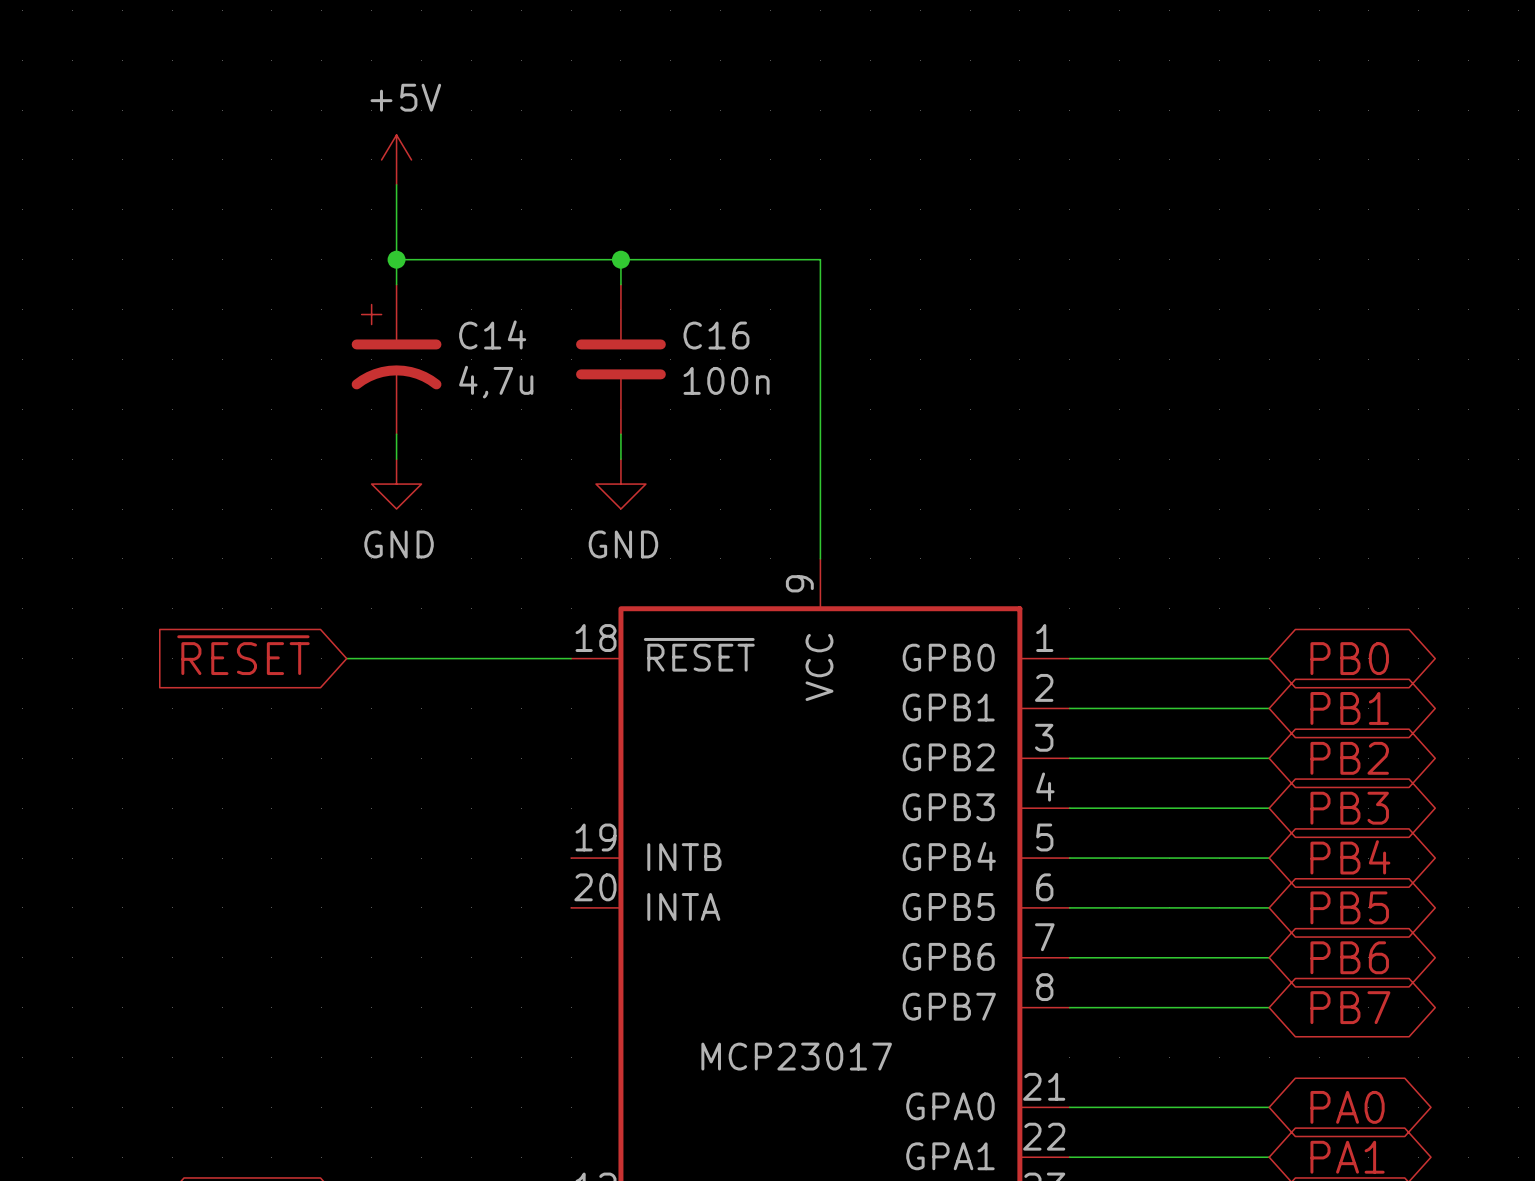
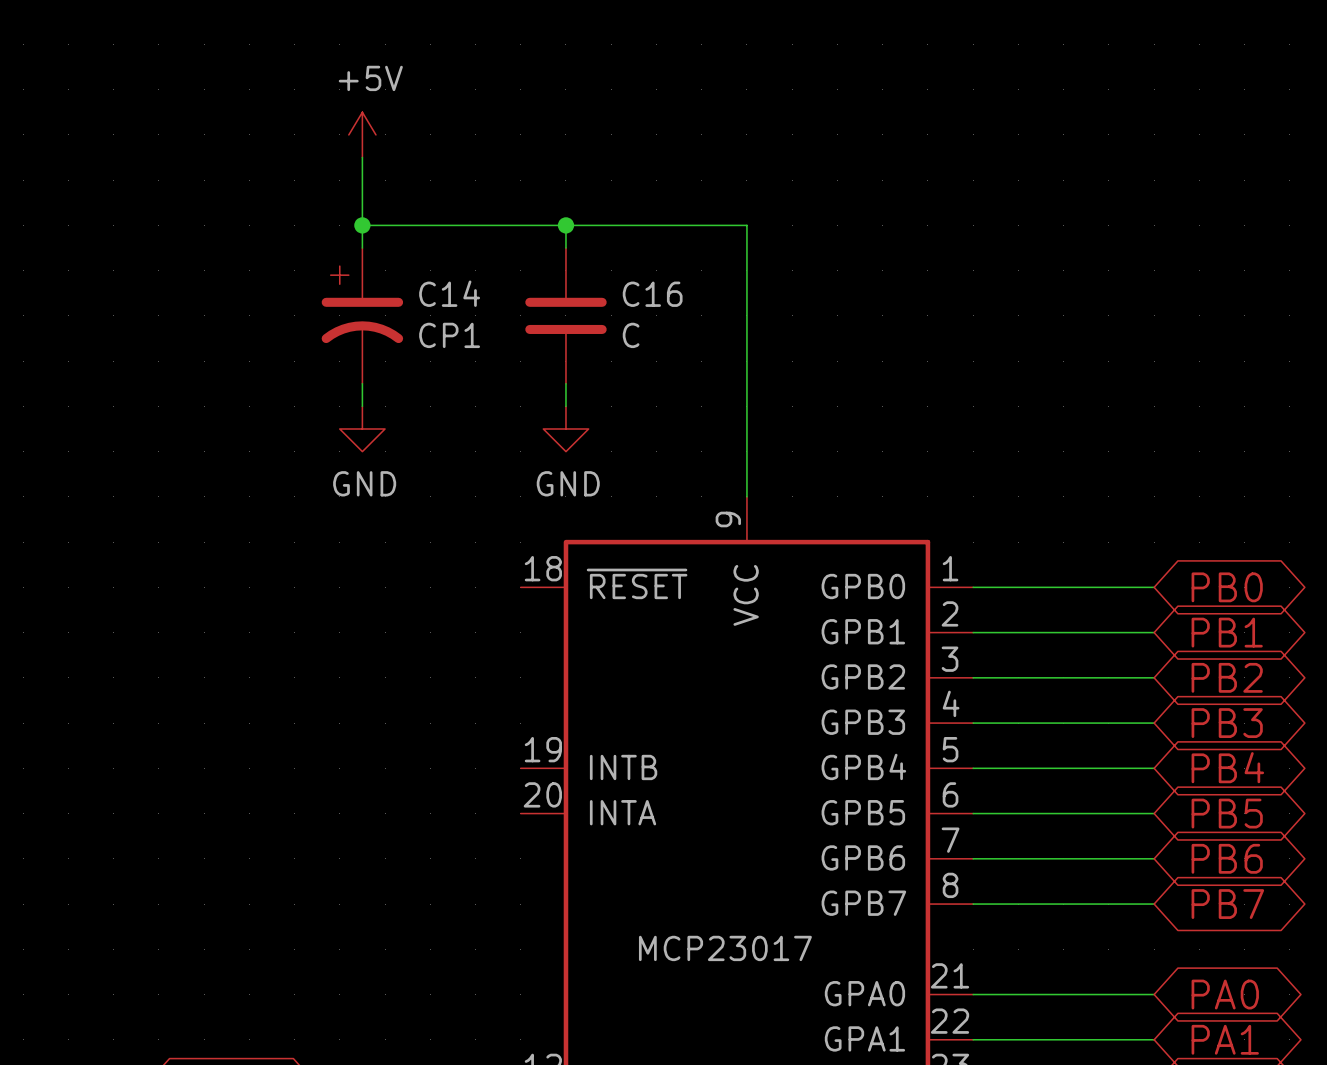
C16 value: 100n (726, 380) -> C (631, 335)
C14 value: 4,7u (496, 382) -> CP1 (449, 335)
global label: ~{RESET} (243, 655) -> none
wire: (346, 658) (571, 658) -> none

